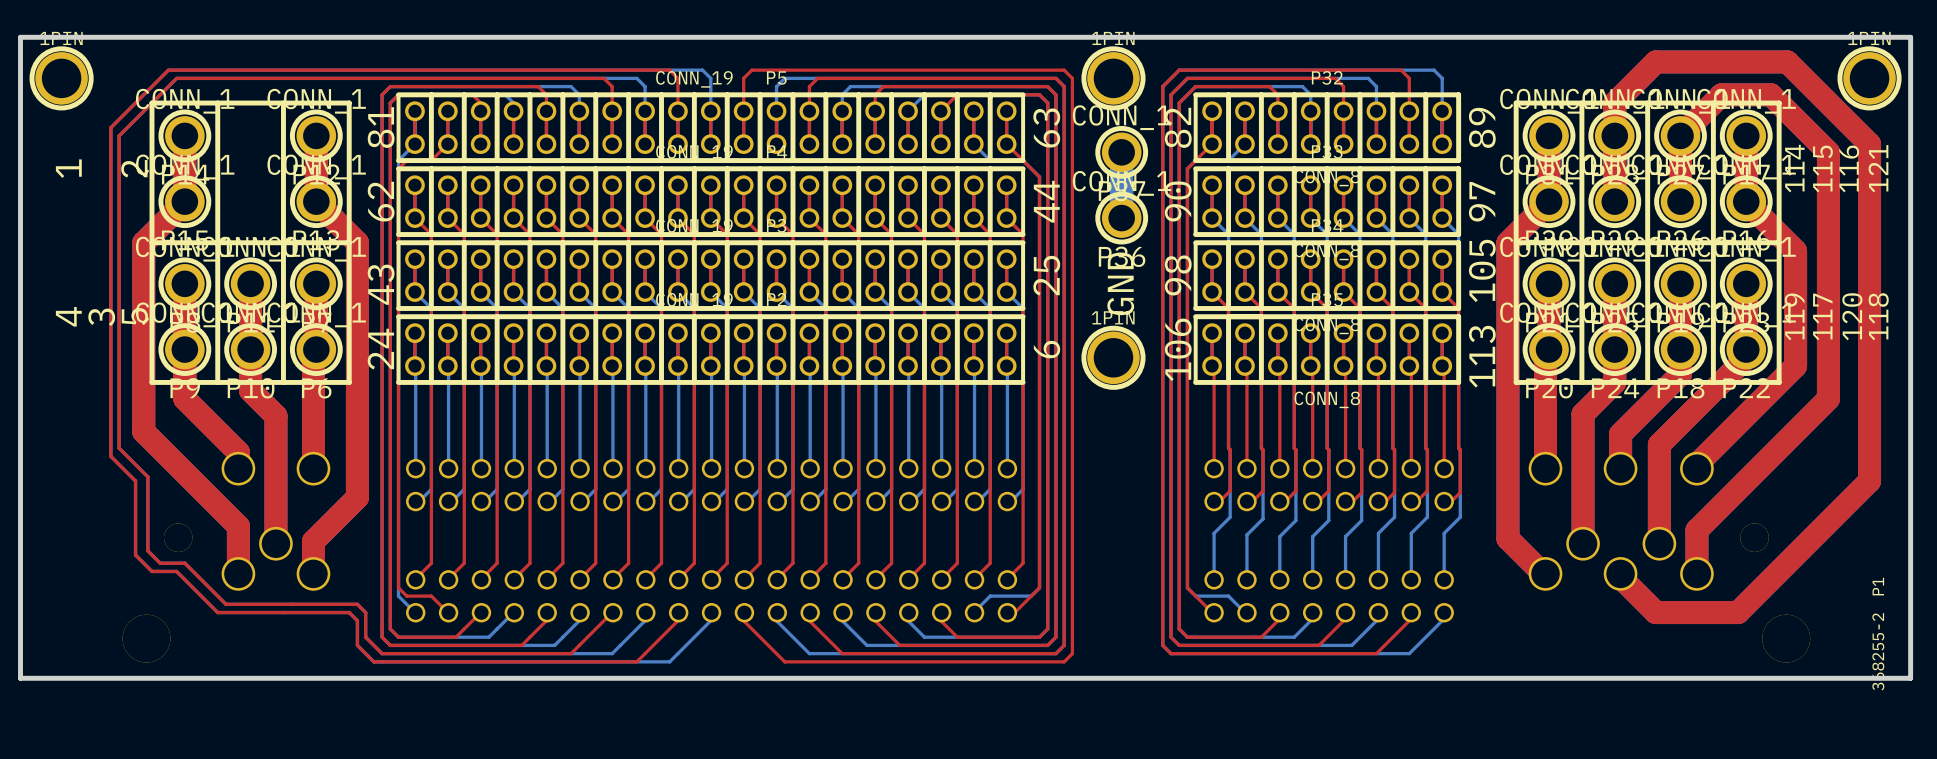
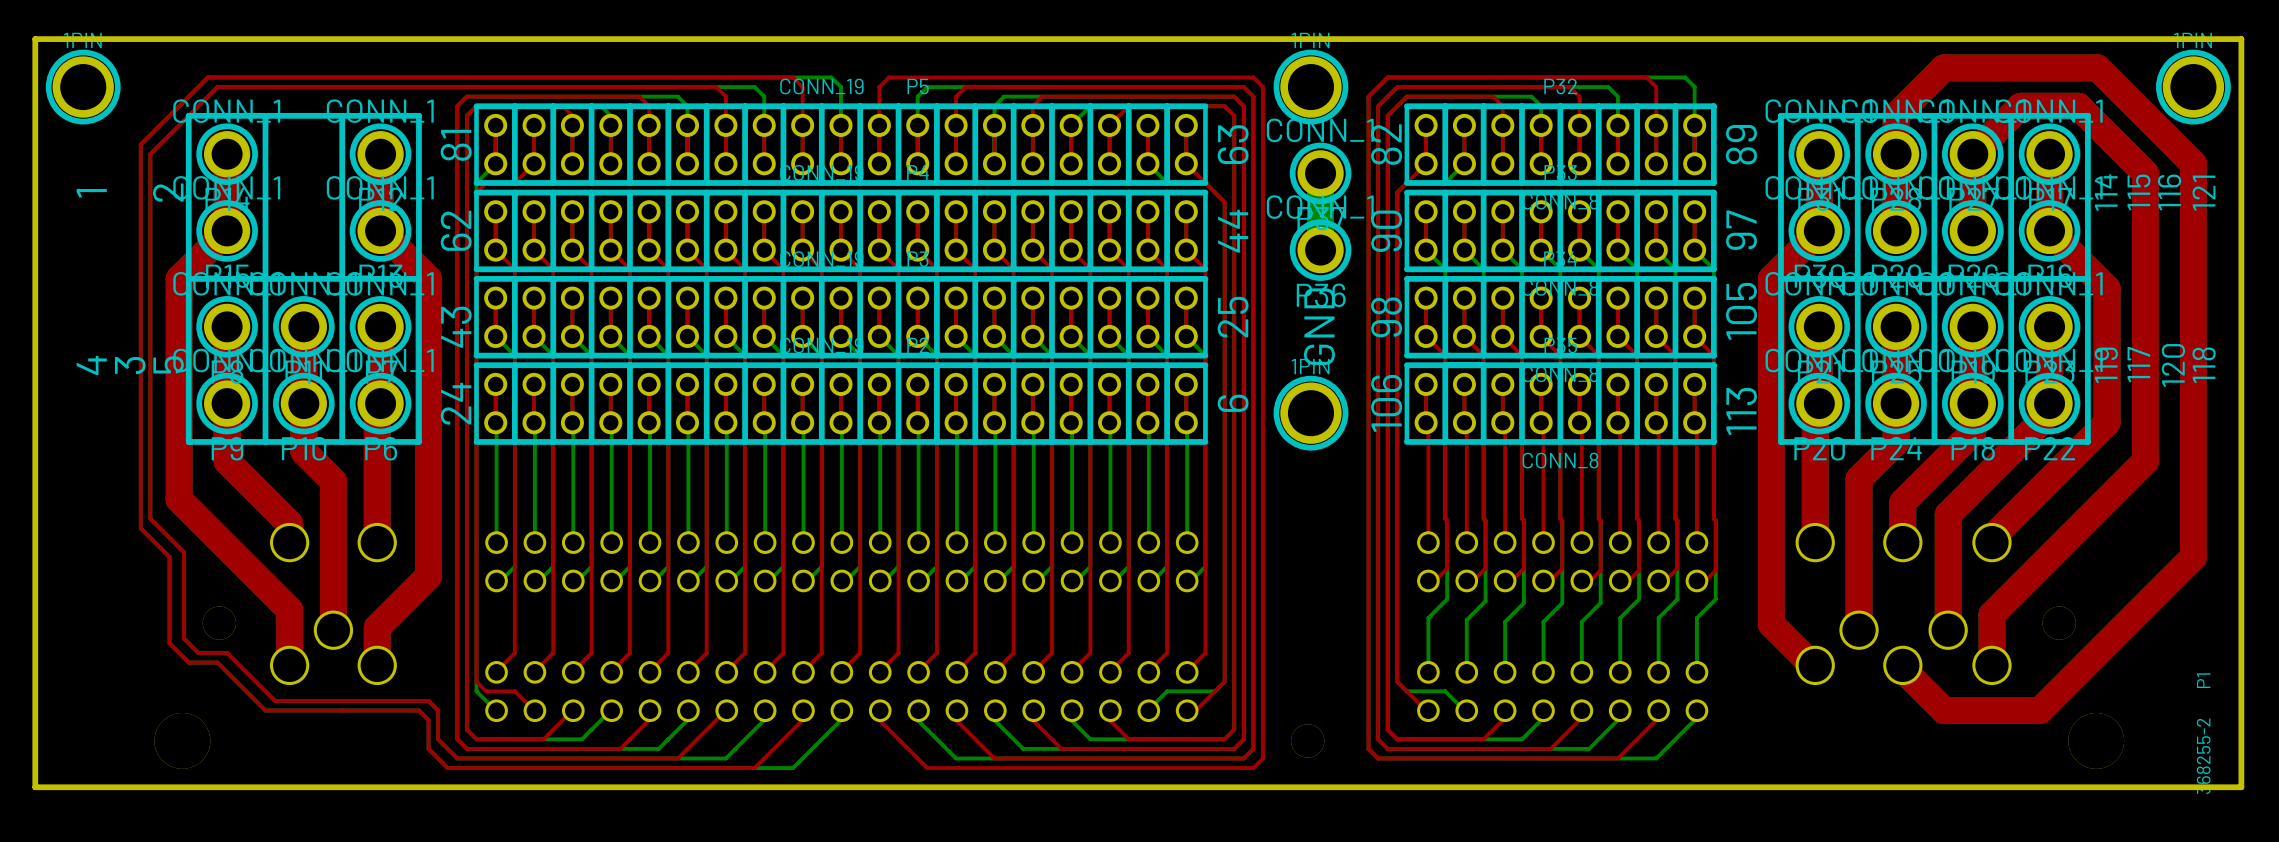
P1 footprint: [122, 451, 1811, 663] -> [154, 522, 2125, 769]

